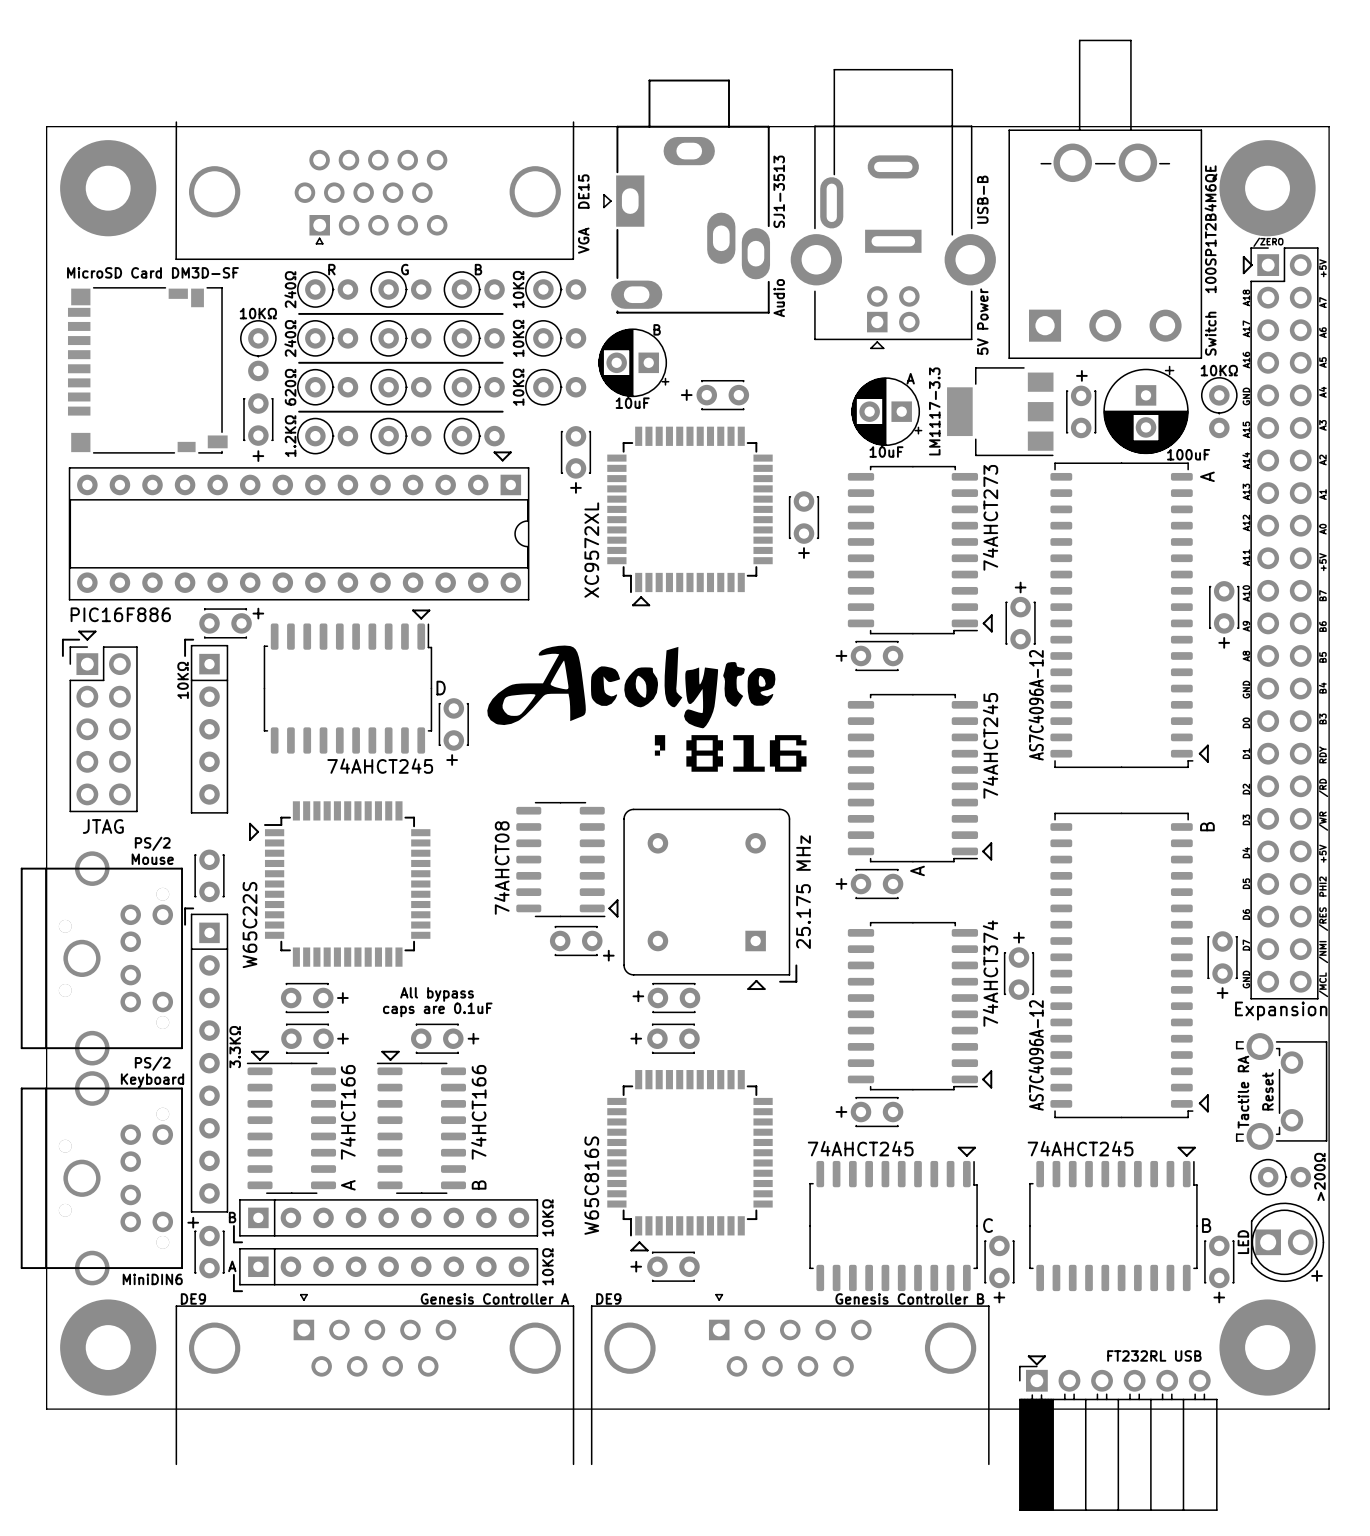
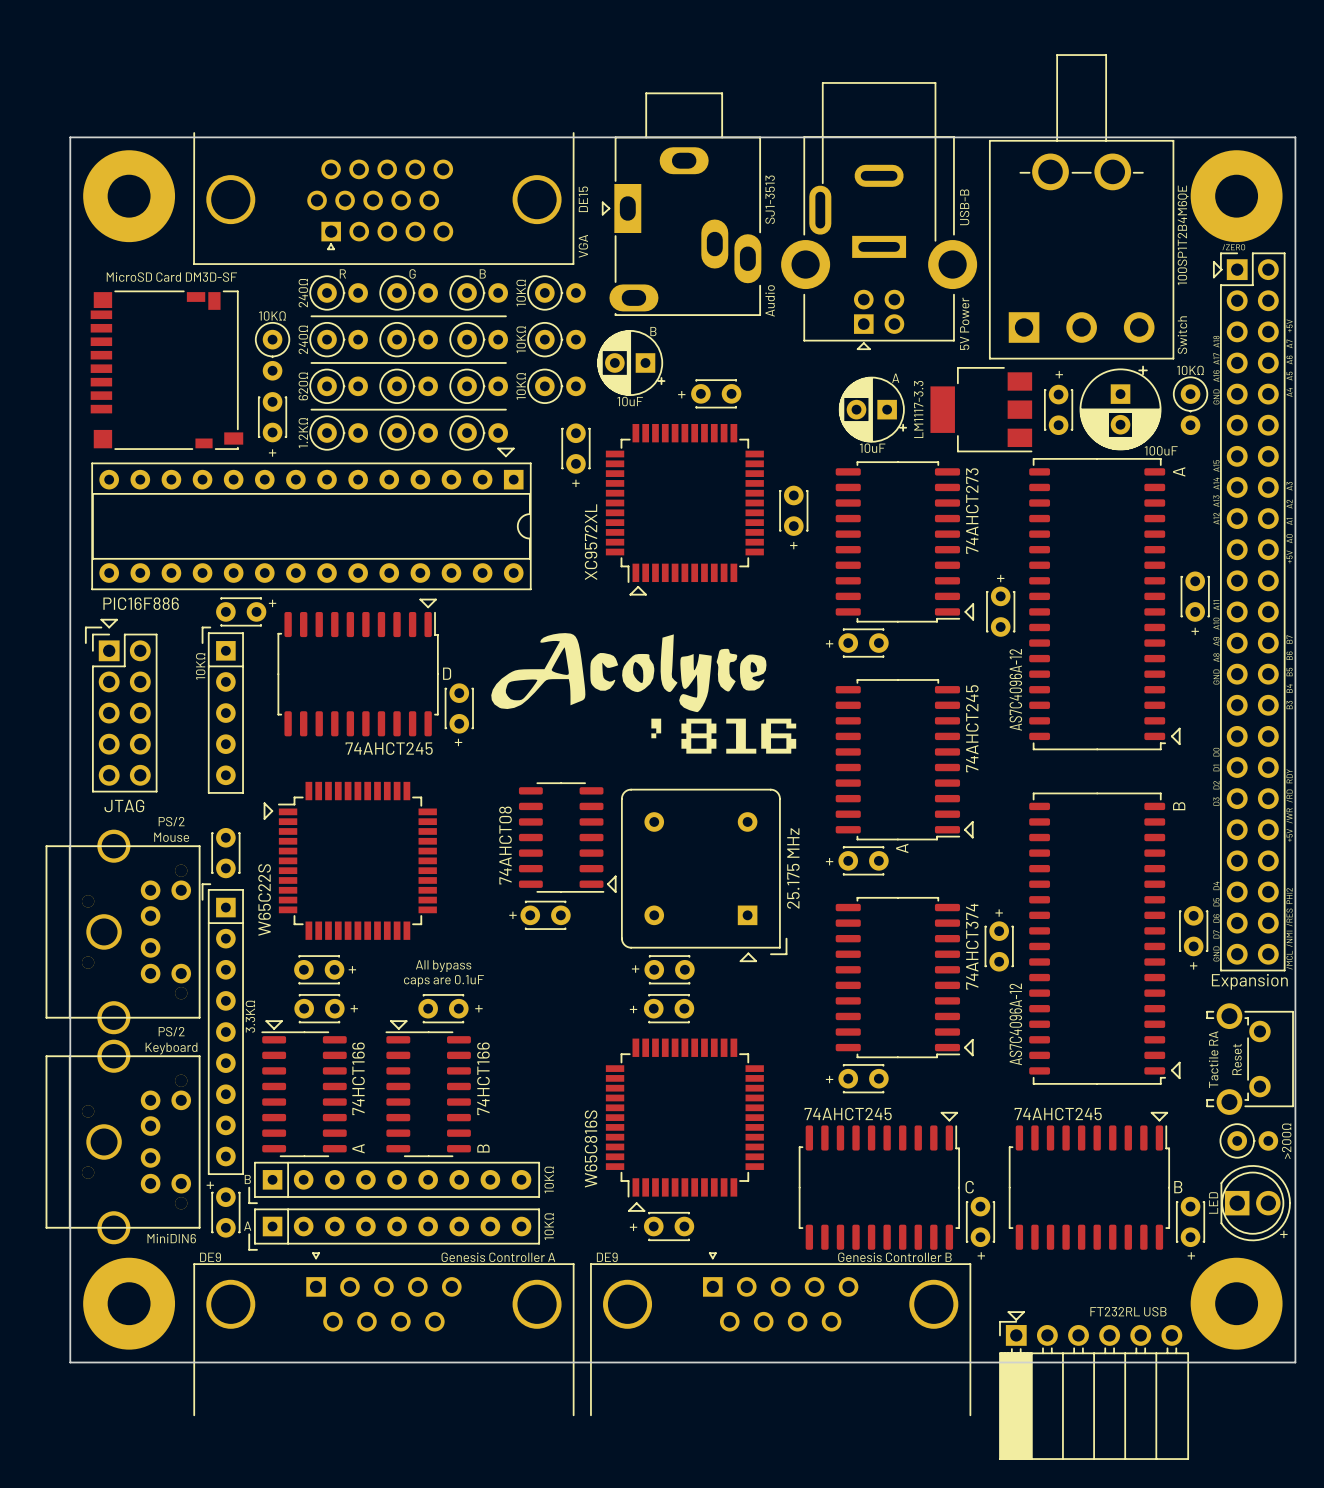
part position: (576, 941) -> (545, 915)
text position: + (608, 955) -> + (512, 915)

